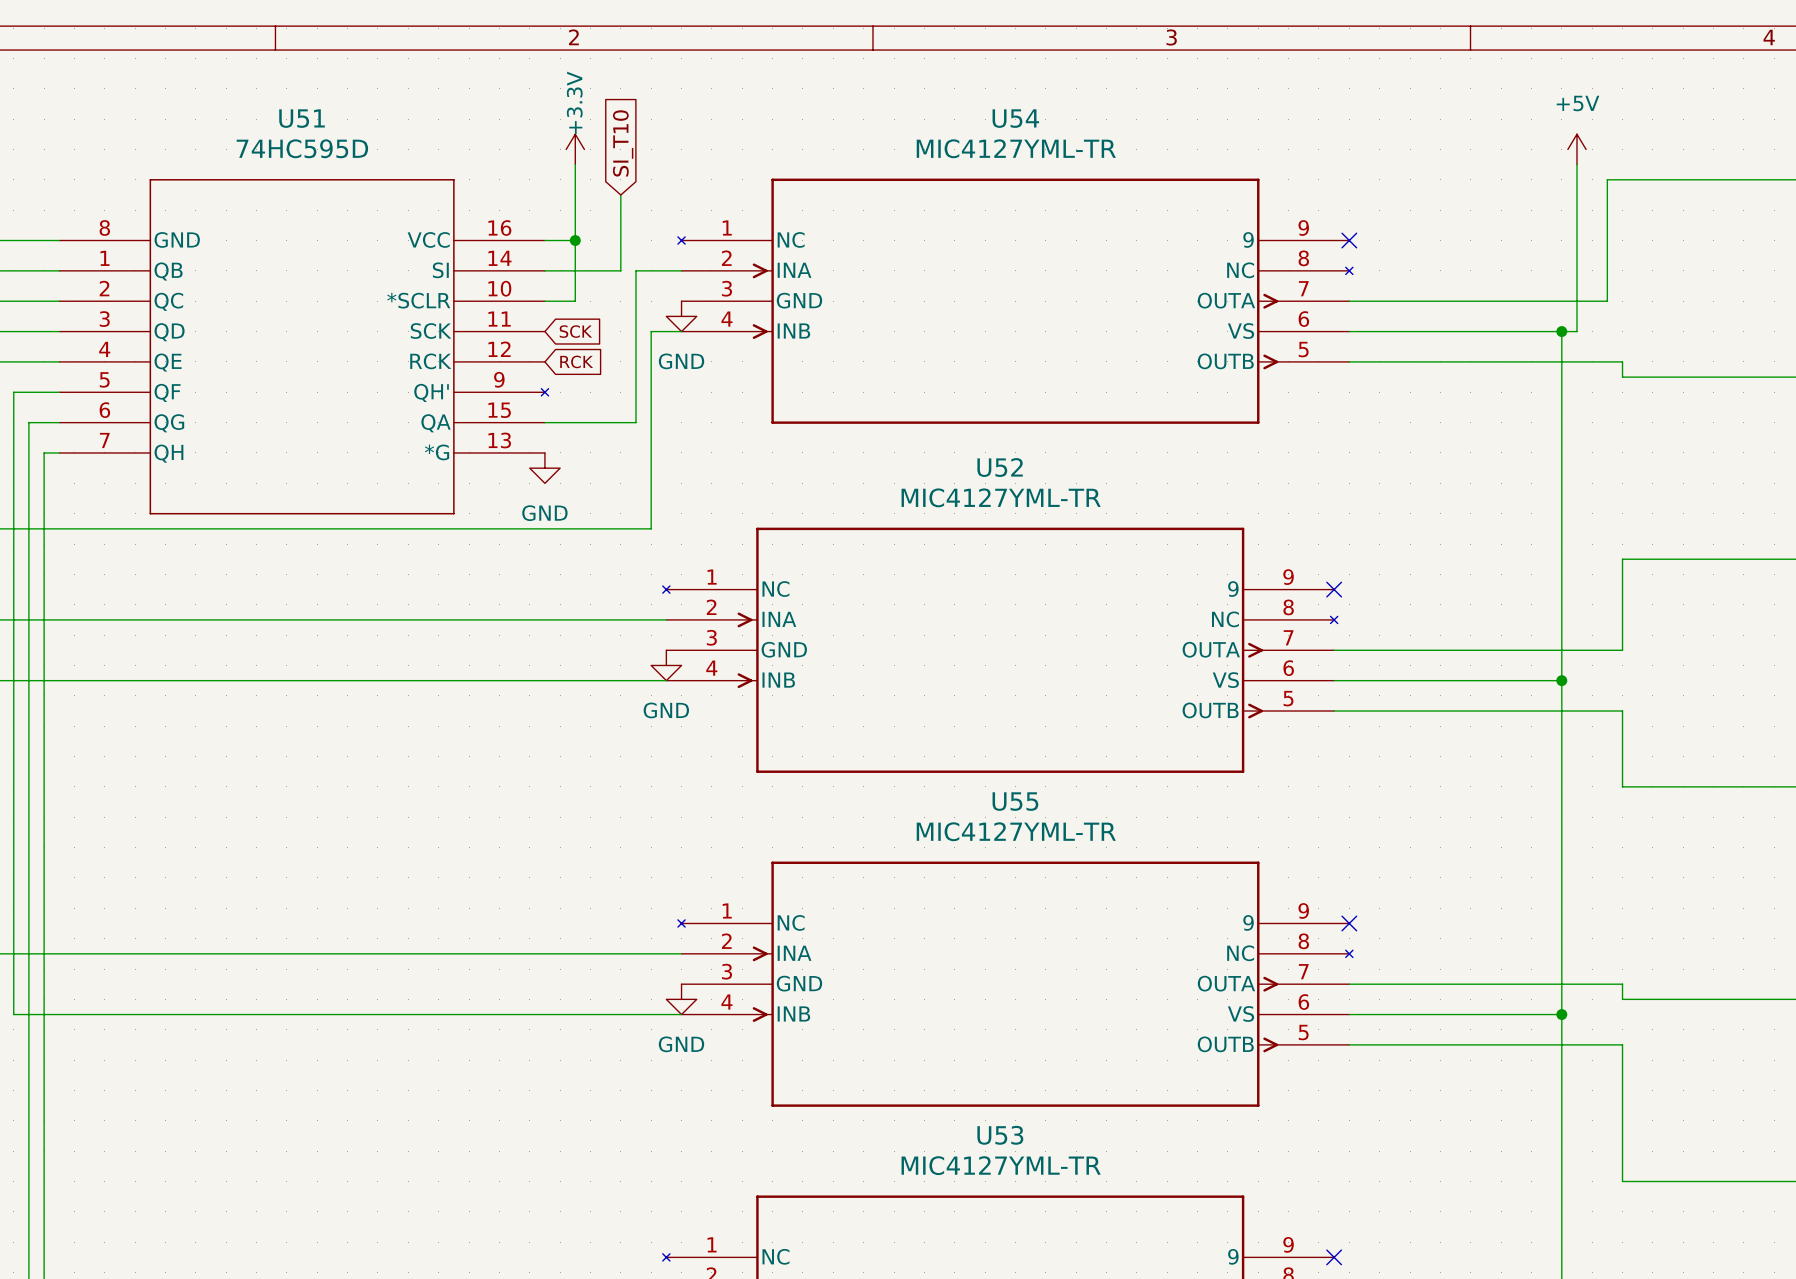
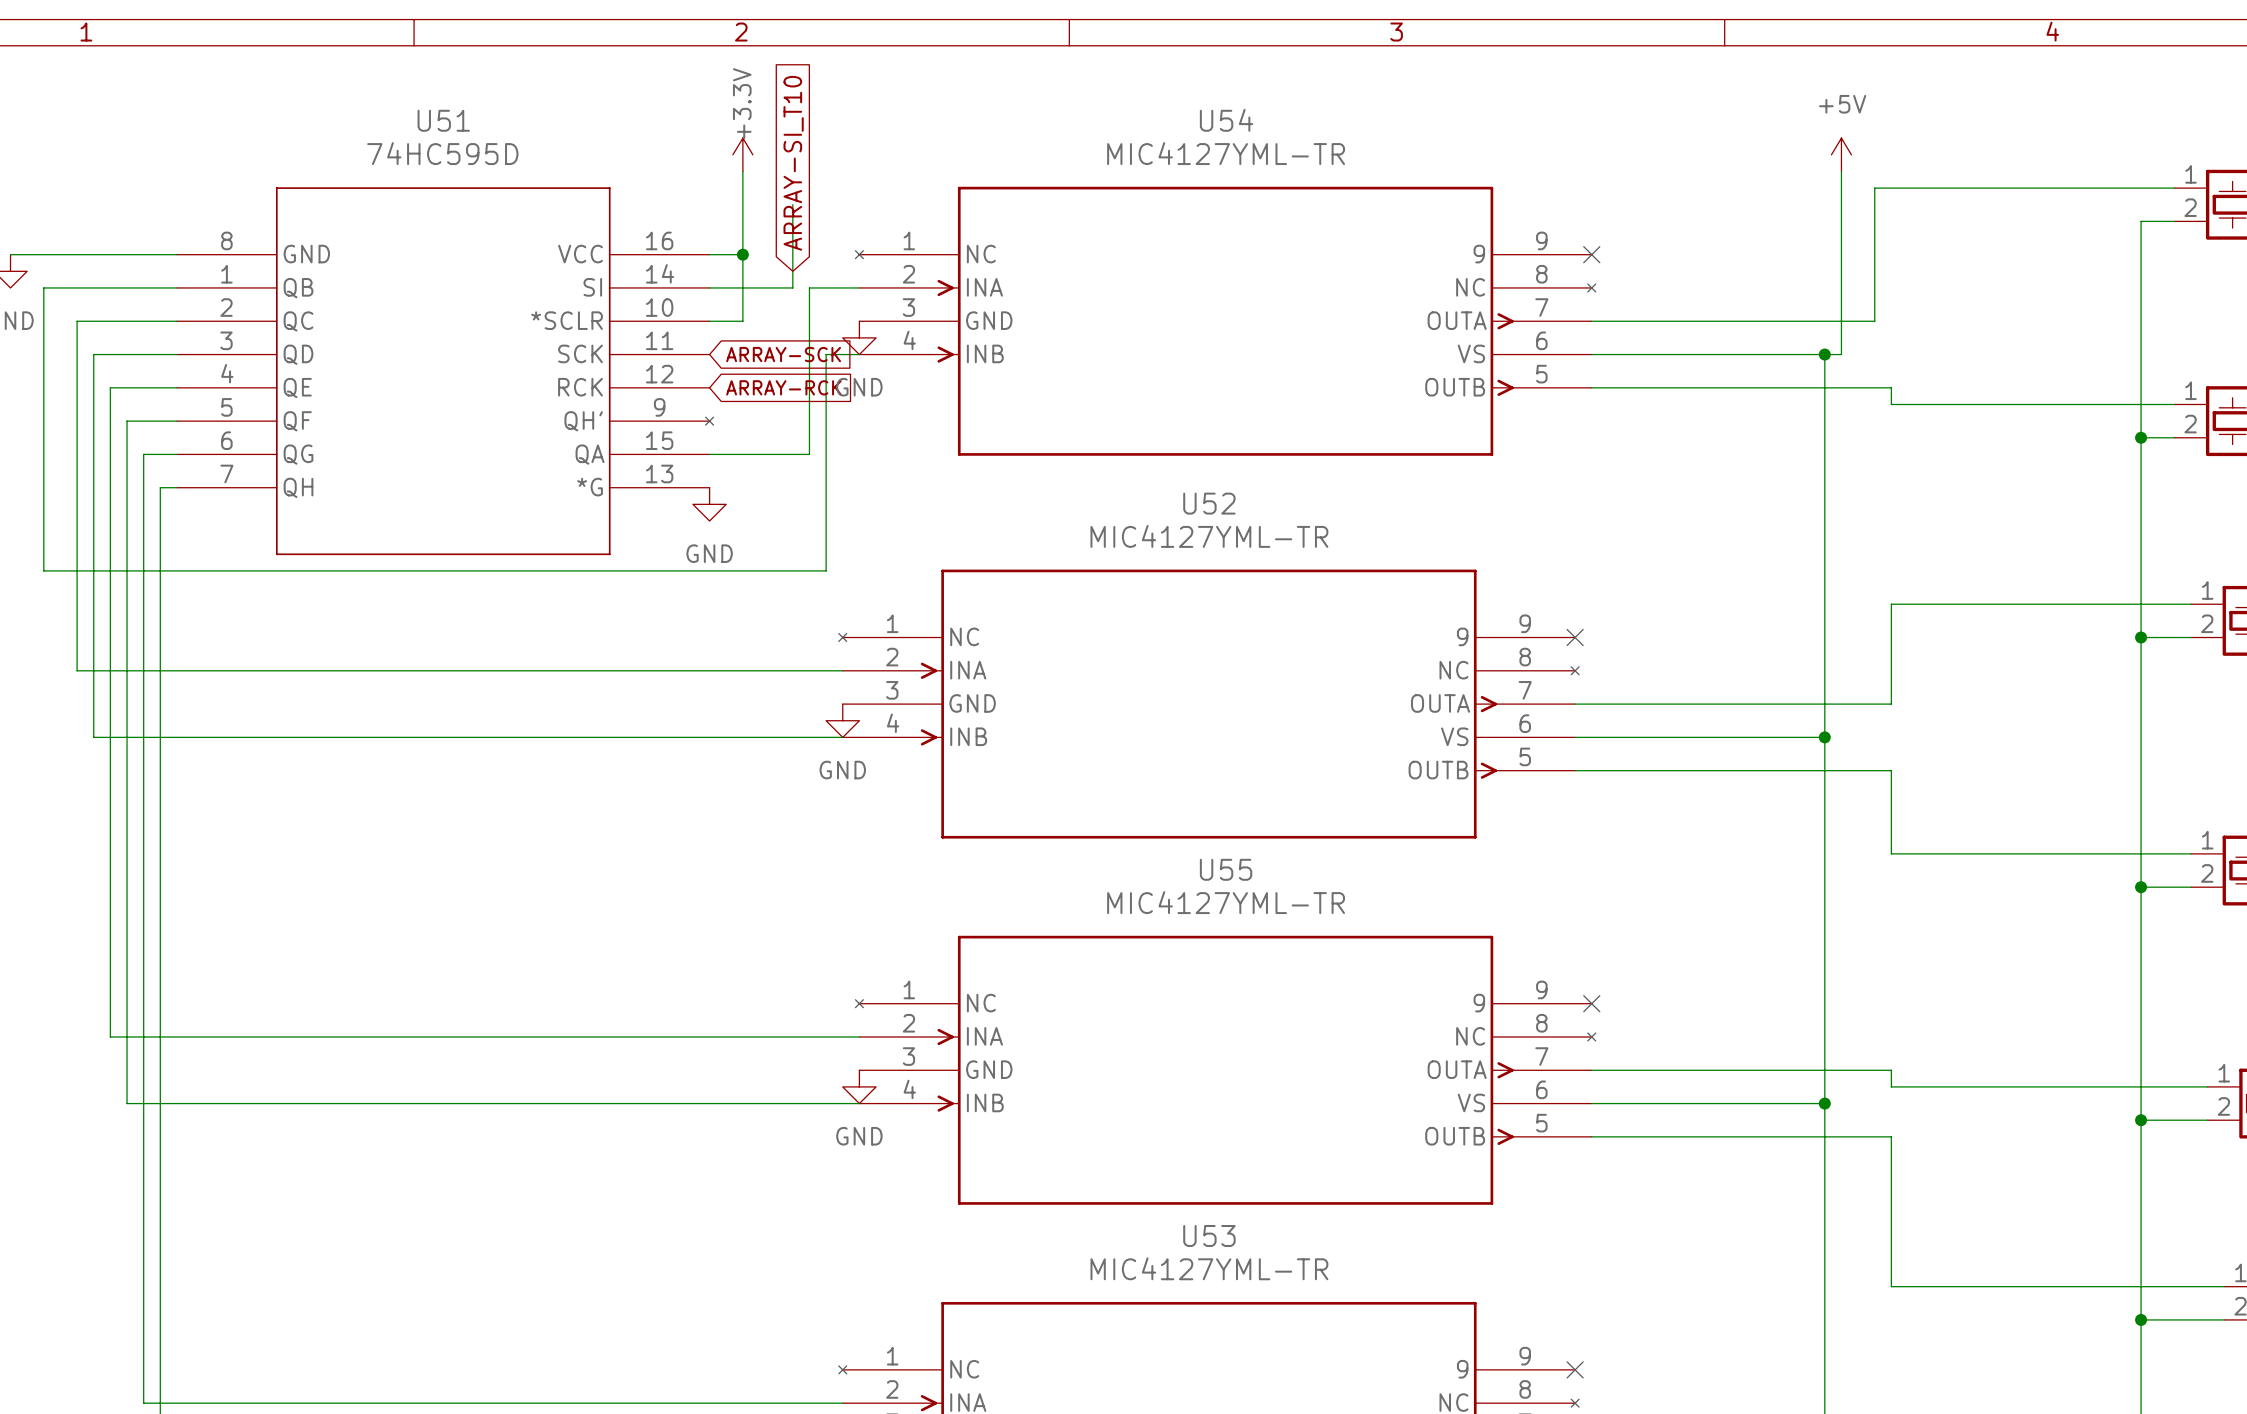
global label: SI_T10 (623, 143) -> ARRAY-SI_T10 (793, 163)
global label: SCK (575, 331) -> ARRAY-SCK (783, 354)
global label: RCK (576, 361) -> ARRAY-RCK (783, 387)

